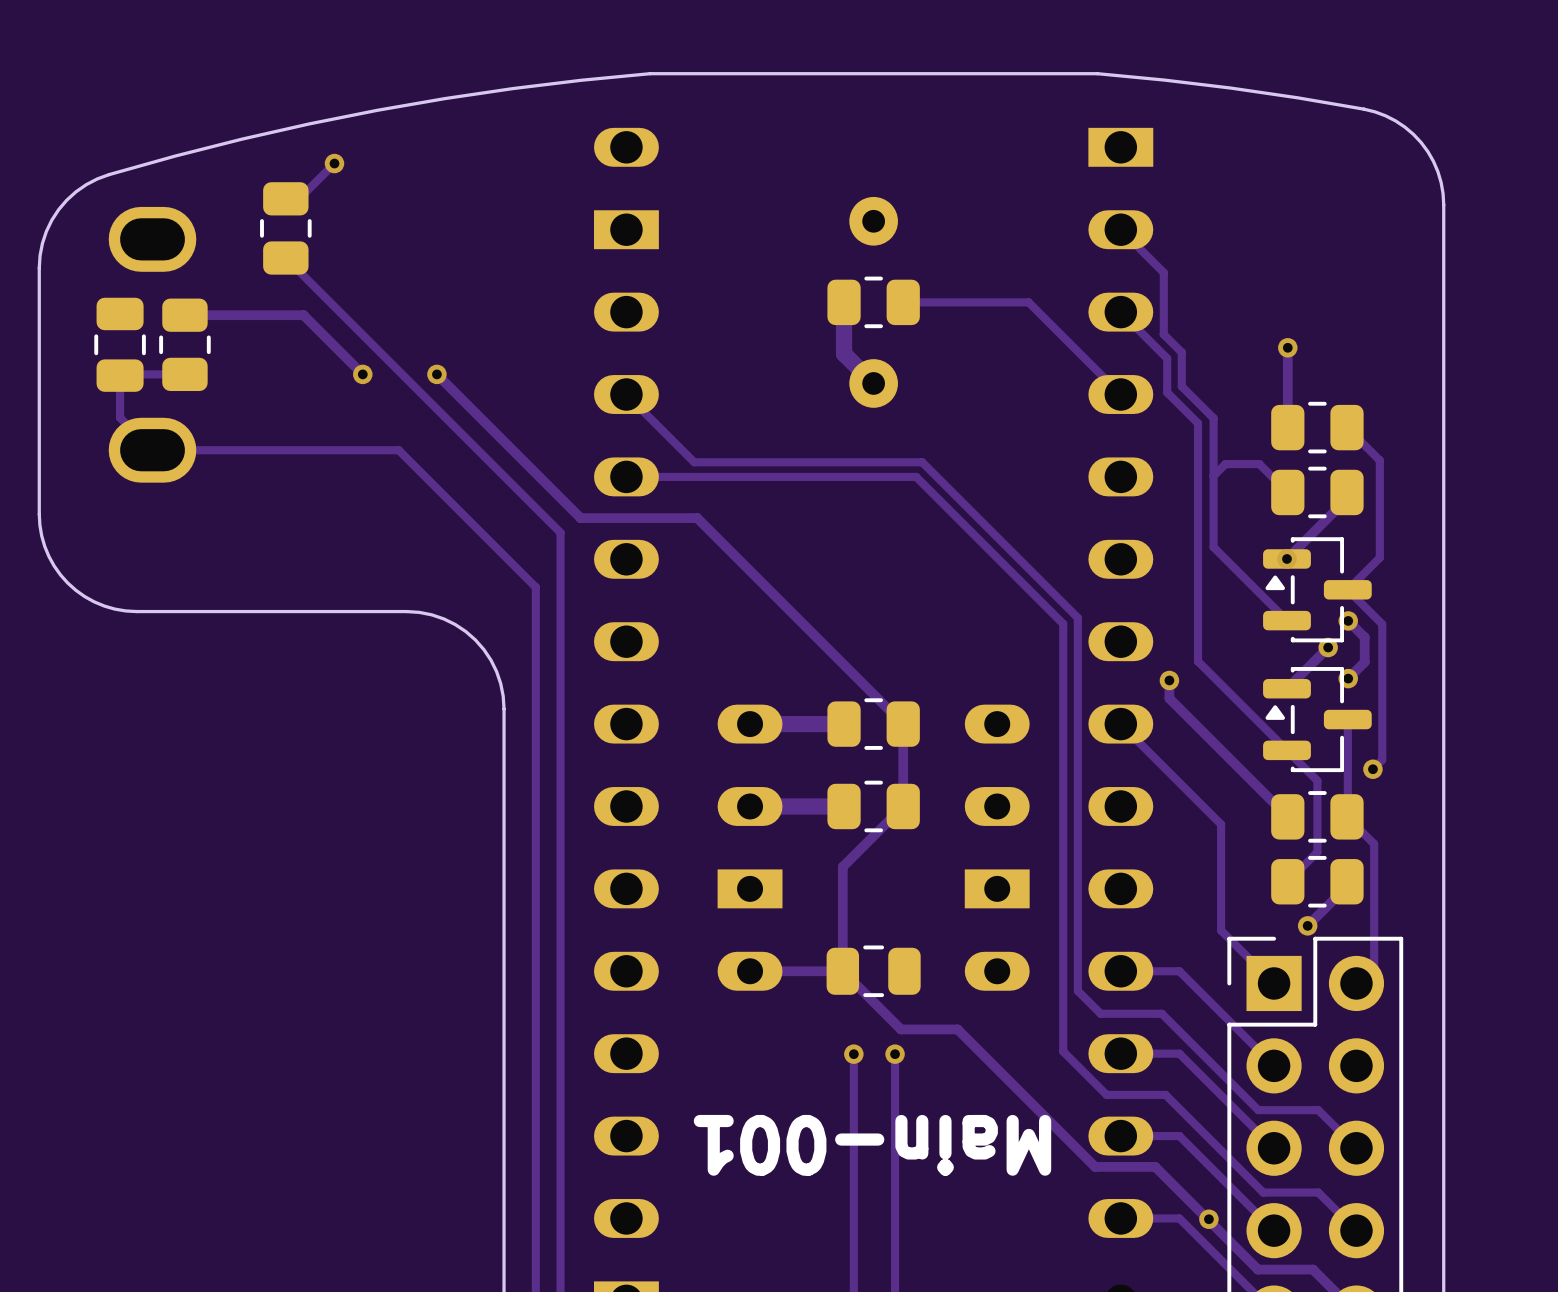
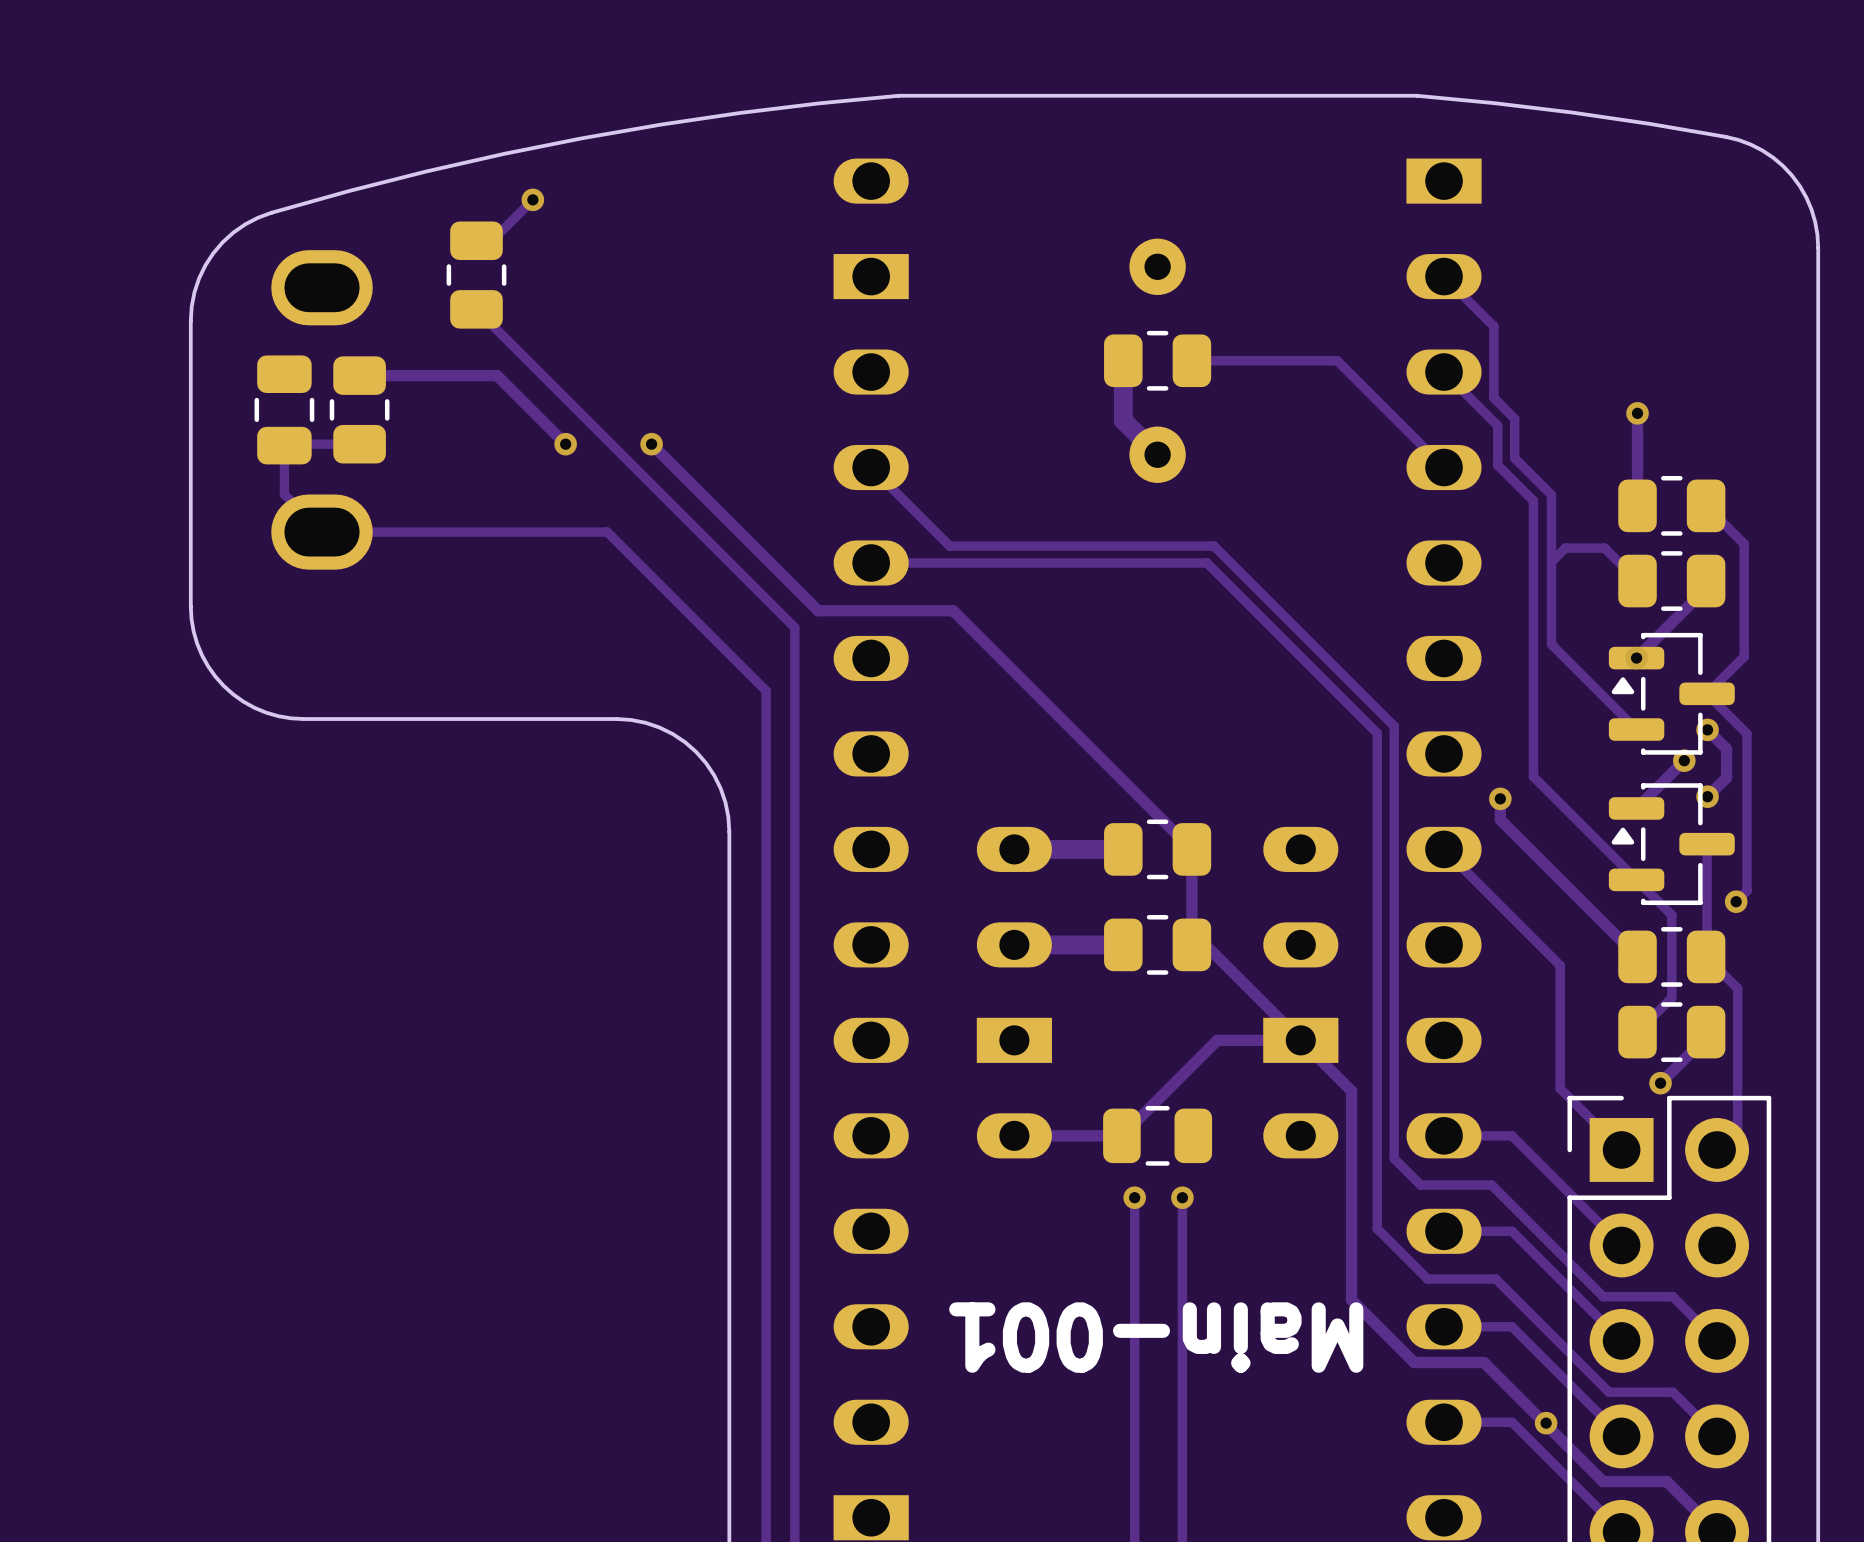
track: (903, 806) (842, 866) (842, 971) (900, 1029) (957, 1029) (1041, 1112) -> (1191, 944) (1205, 944) (1351, 1091) (1351, 1299)
track: none -> (1300, 1040) (1217, 1040) (1121, 1135)
track: none -> (1134, 1197) (1134, 1231)
via: none -> (1134, 1197)
track: none -> (1182, 1197) (1182, 1231)
via: none -> (1182, 1197)
via: (853, 1054) -> none
via: (895, 1054) -> none

